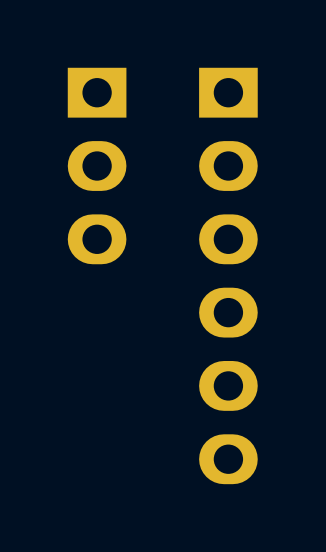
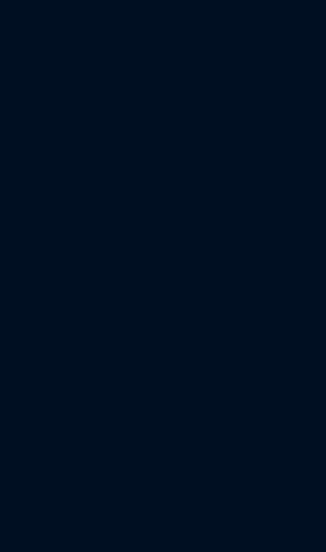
part: (97, 166) -> none
part: (228, 275) -> none

